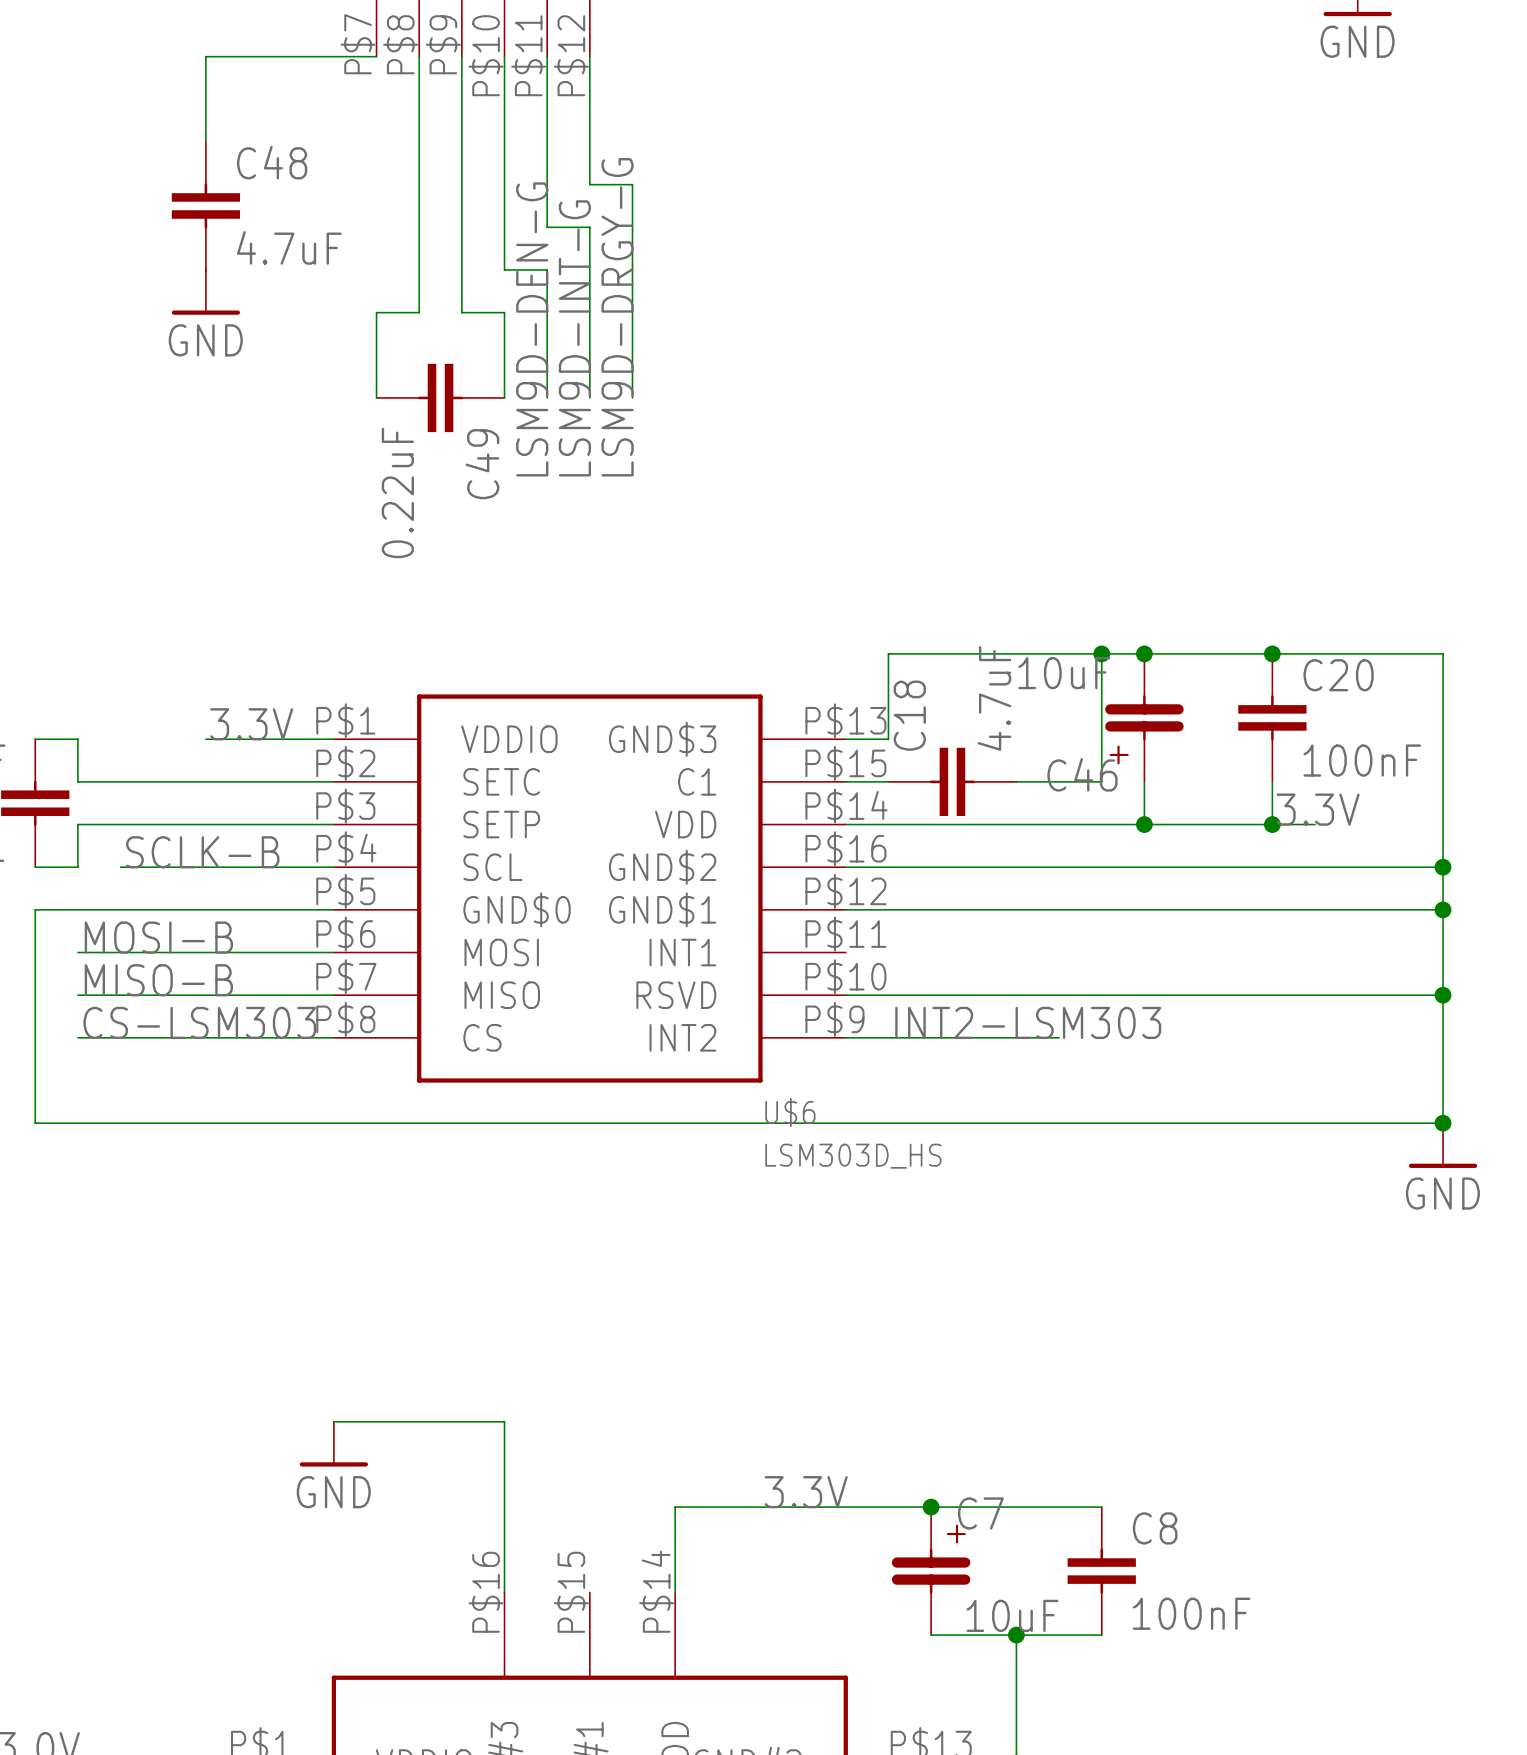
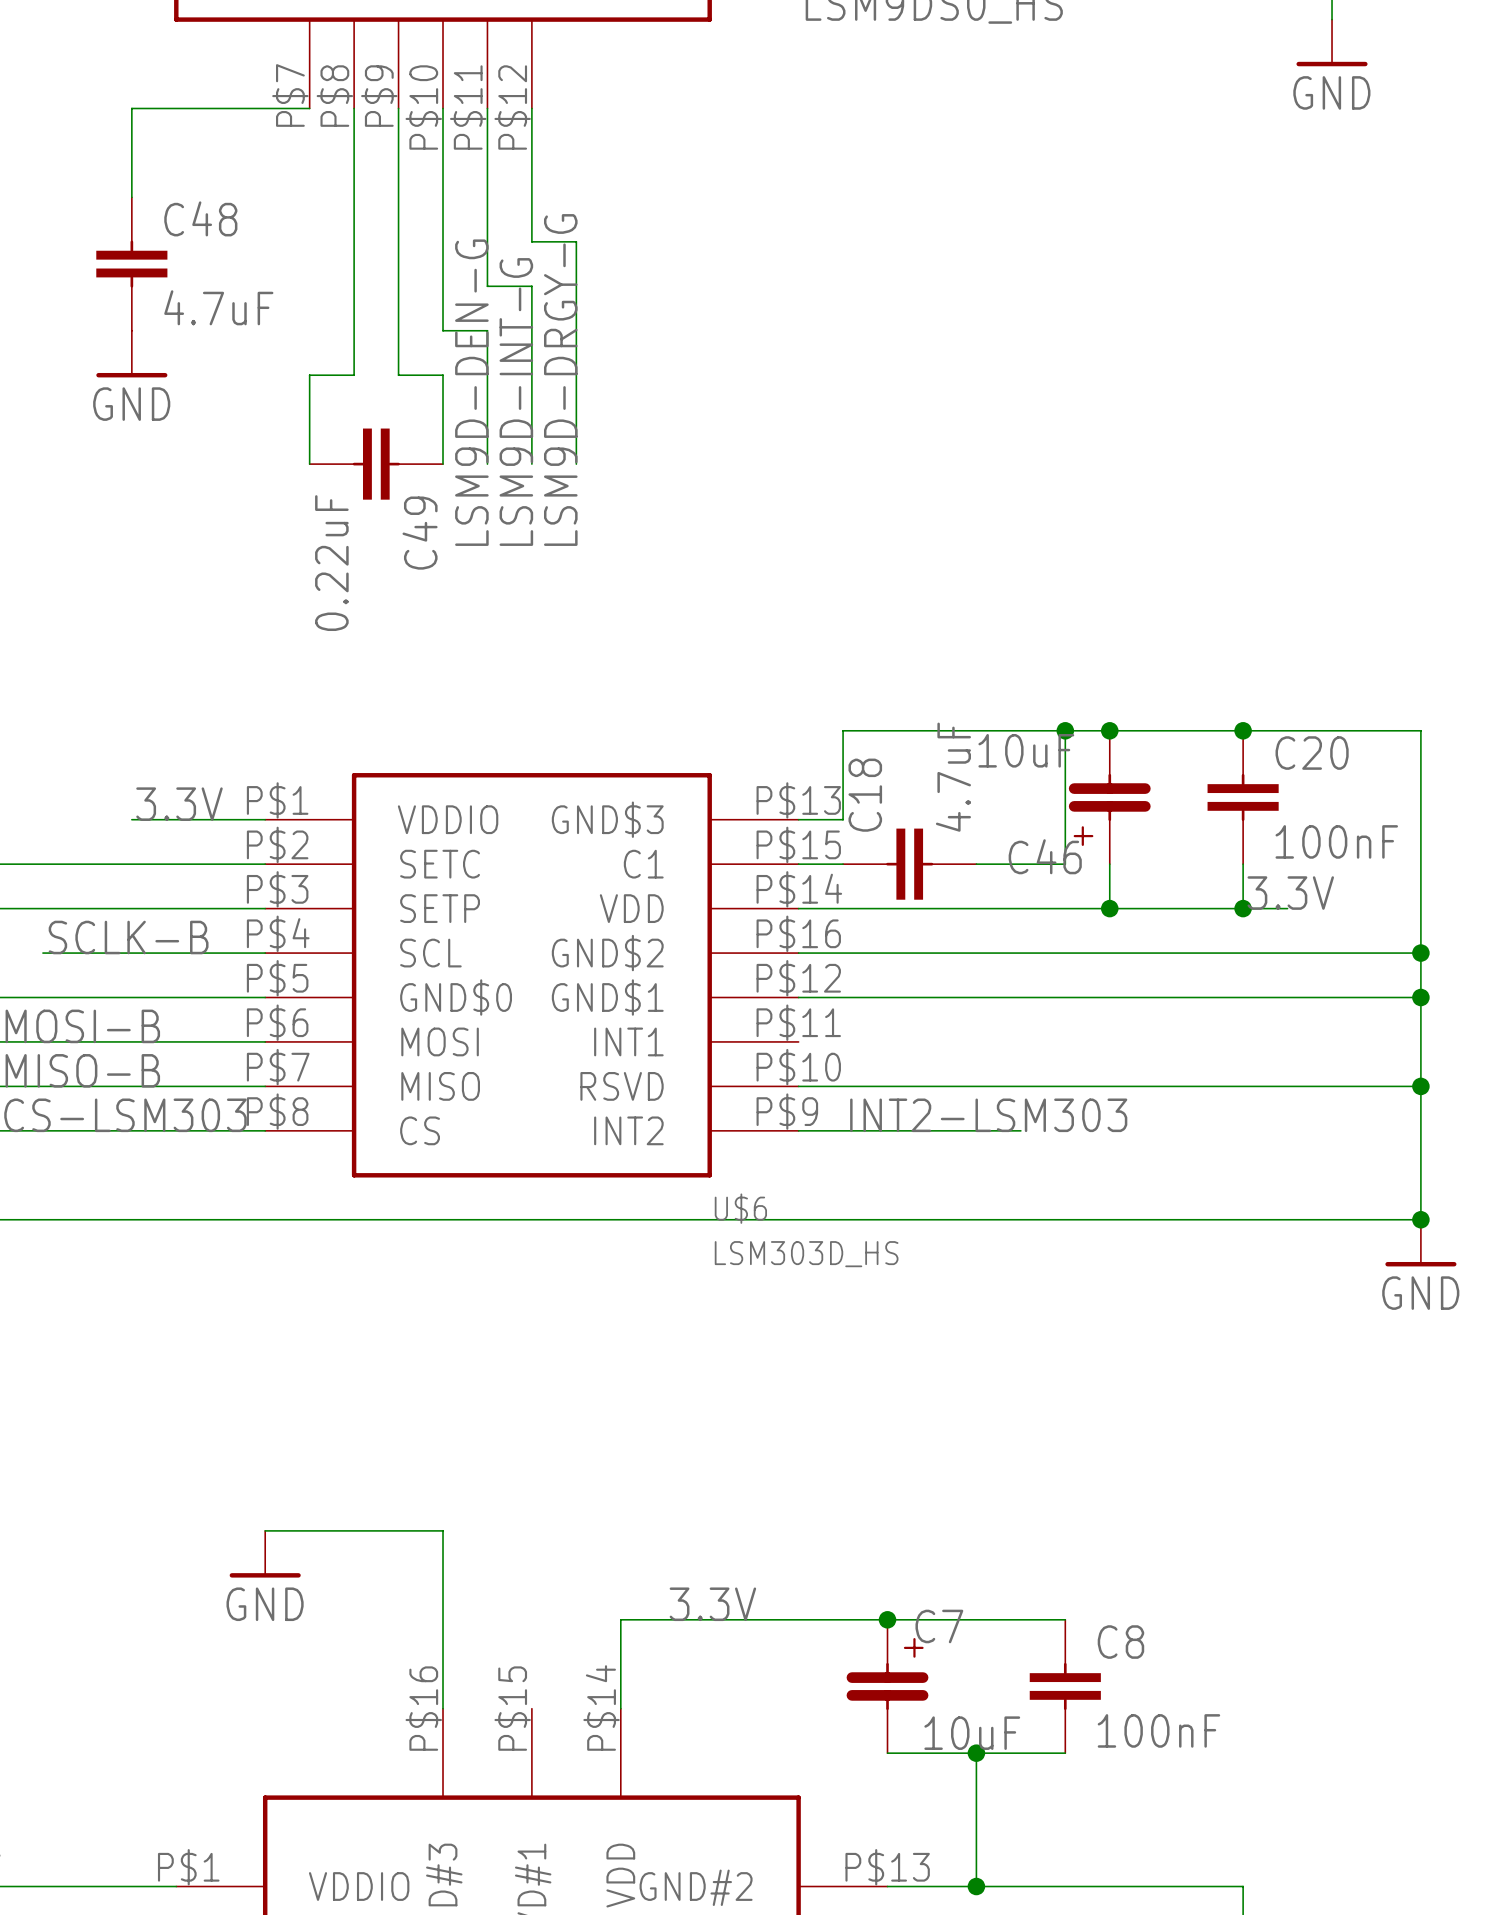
label position: 3.3V (806, 1492) -> 3.3V (712, 1604)

